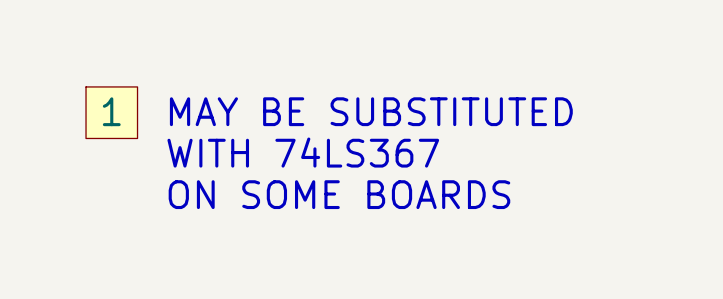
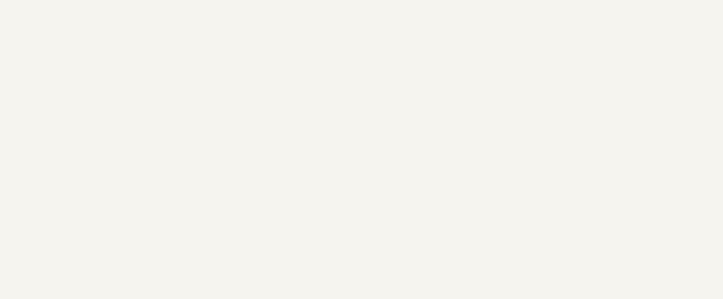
text: MAY BE SUBSTITUTED (371, 111) -> none
part: 1 (111, 112) -> none
text: WITH 74LS367 (303, 152) -> none
text: ON SOME BOARDS (339, 194) -> none

